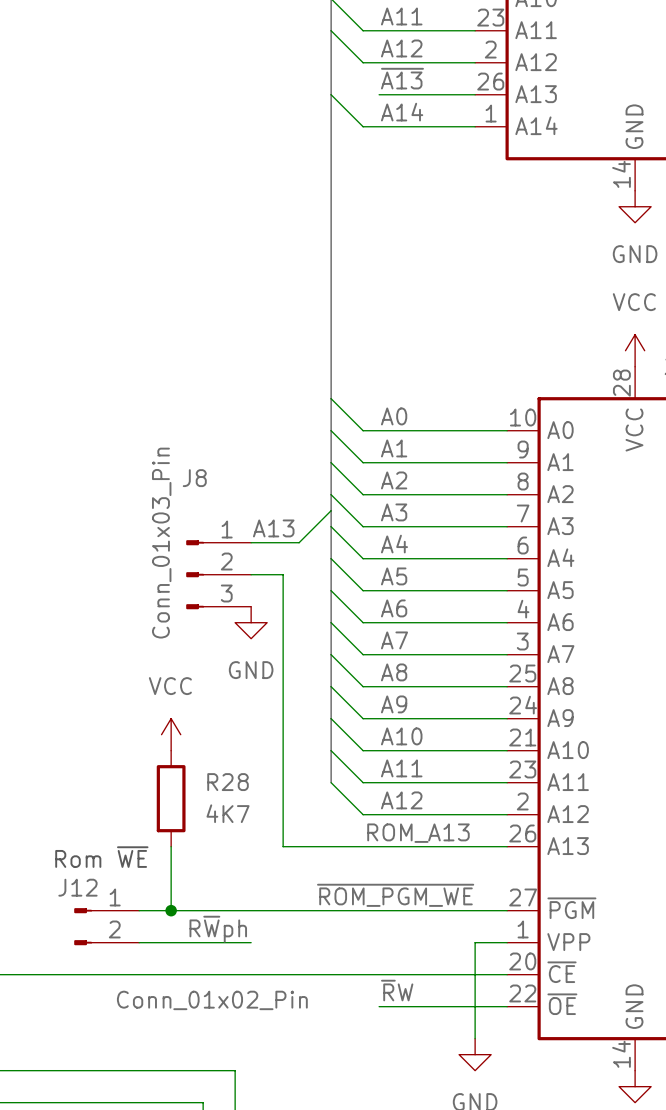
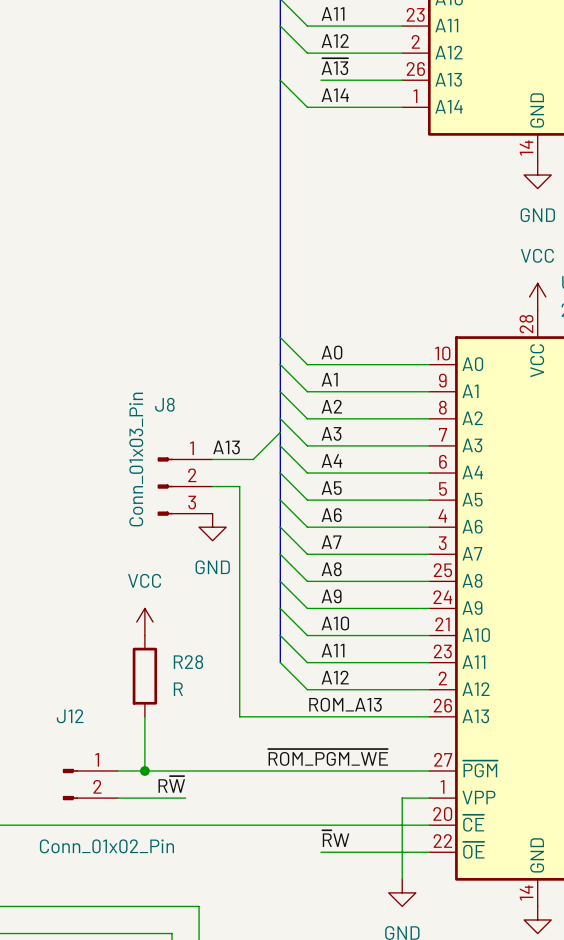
R28 value: 4K7 (228, 813) -> R (178, 689)
text: Rom ~{WE} (101, 857) -> none
J12 name position: J12 (77, 887) -> J12 (70, 716)
label: R~{W}ph (218, 929) -> R~{W} (171, 784)
wire: (219, 942) (251, 942) -> none
J12 value position: Conn_01x02_Pin (212, 1000) -> Conn_01x02_Pin (106, 846)

